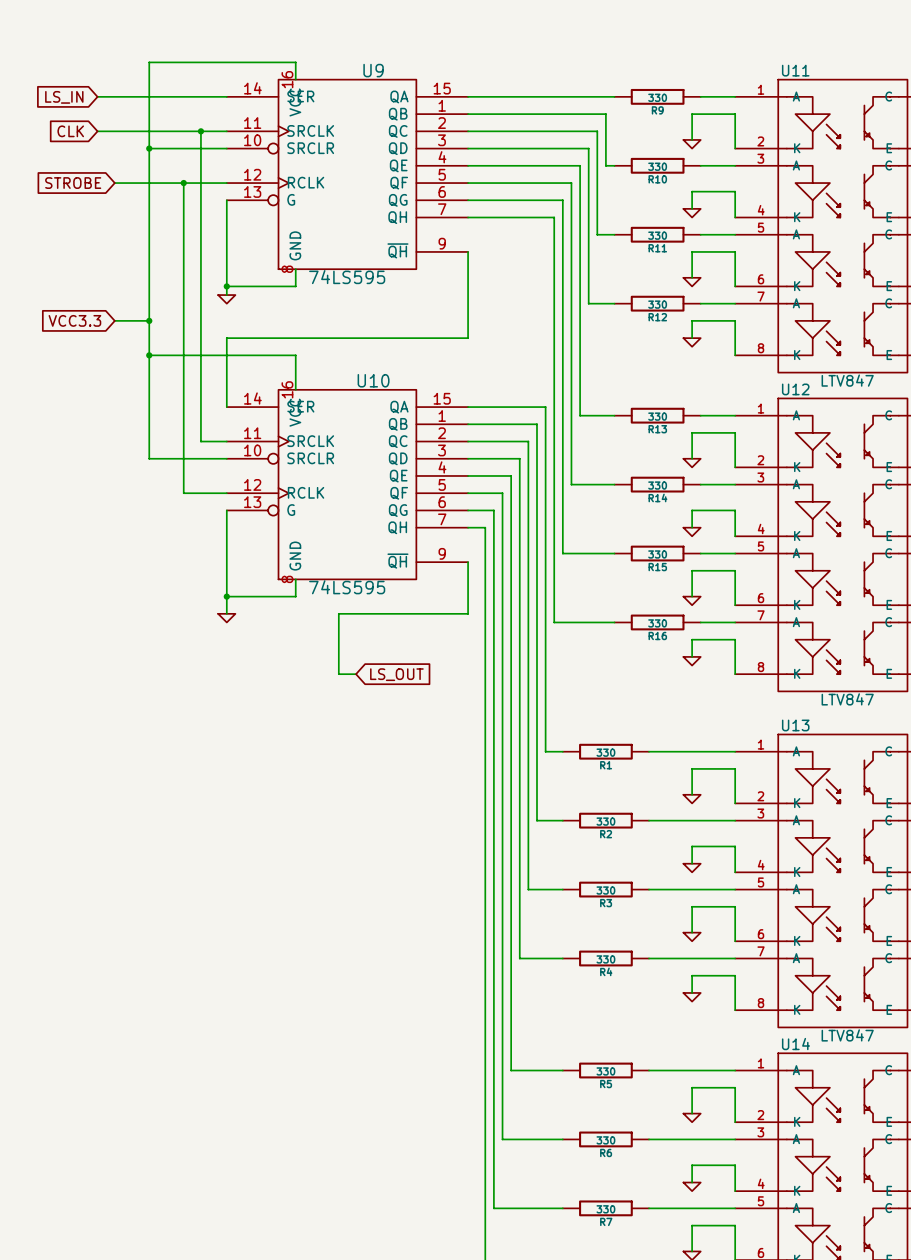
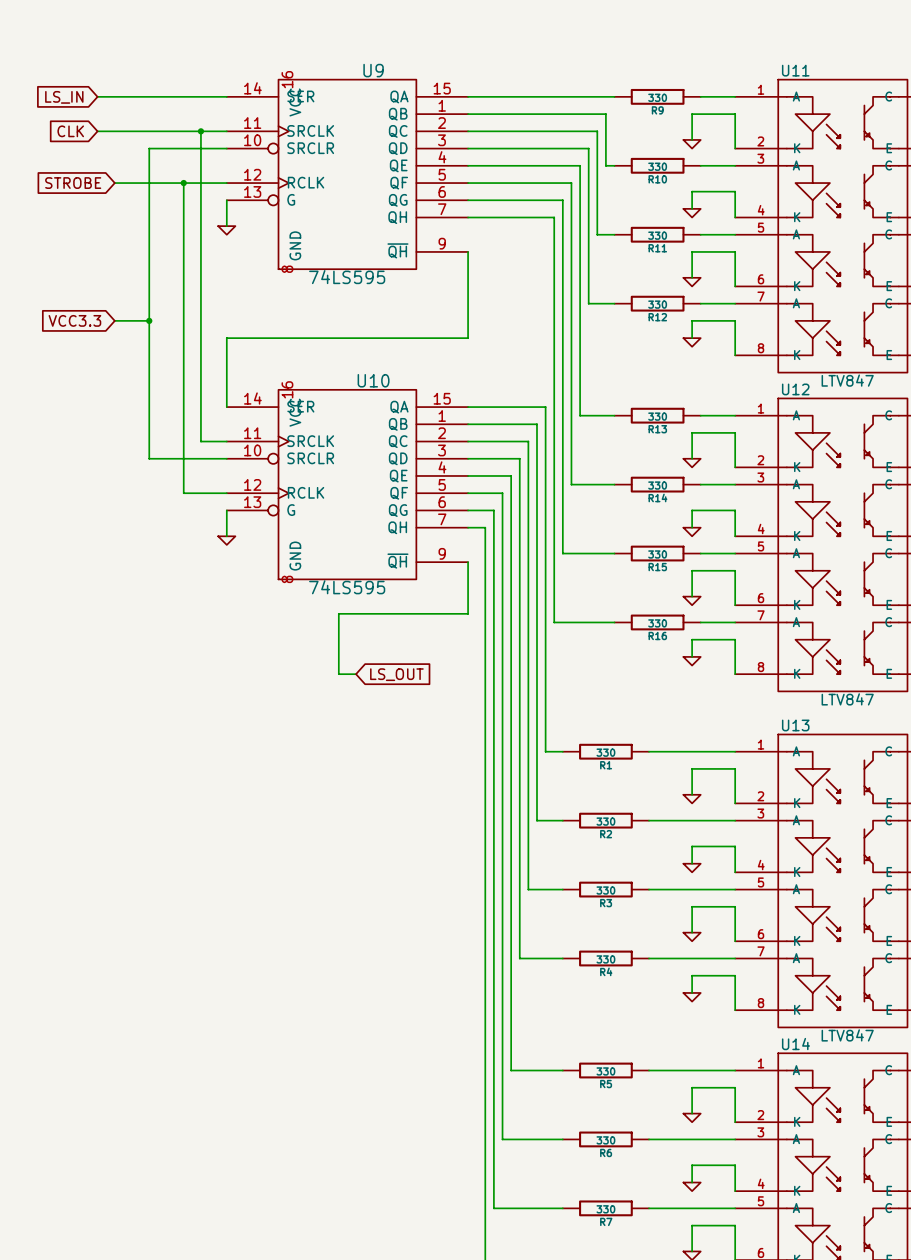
wire: (295, 79) (295, 62) (149, 62) (149, 148) -> none
junction: (149, 148) -> none
wire: (226, 226) (226, 295) -> none
wire: (295, 269) (295, 286) (226, 286) -> none
junction: (226, 286) -> none
power symbol position: (226, 299) -> (226, 230)
wire: (149, 355) (295, 355) (295, 389) -> none
junction: (149, 355) -> none
wire: (226, 536) (226, 613) -> none
wire: (295, 579) (295, 596) (226, 596) -> none
junction: (226, 596) -> none
power symbol position: (226, 618) -> (226, 540)

